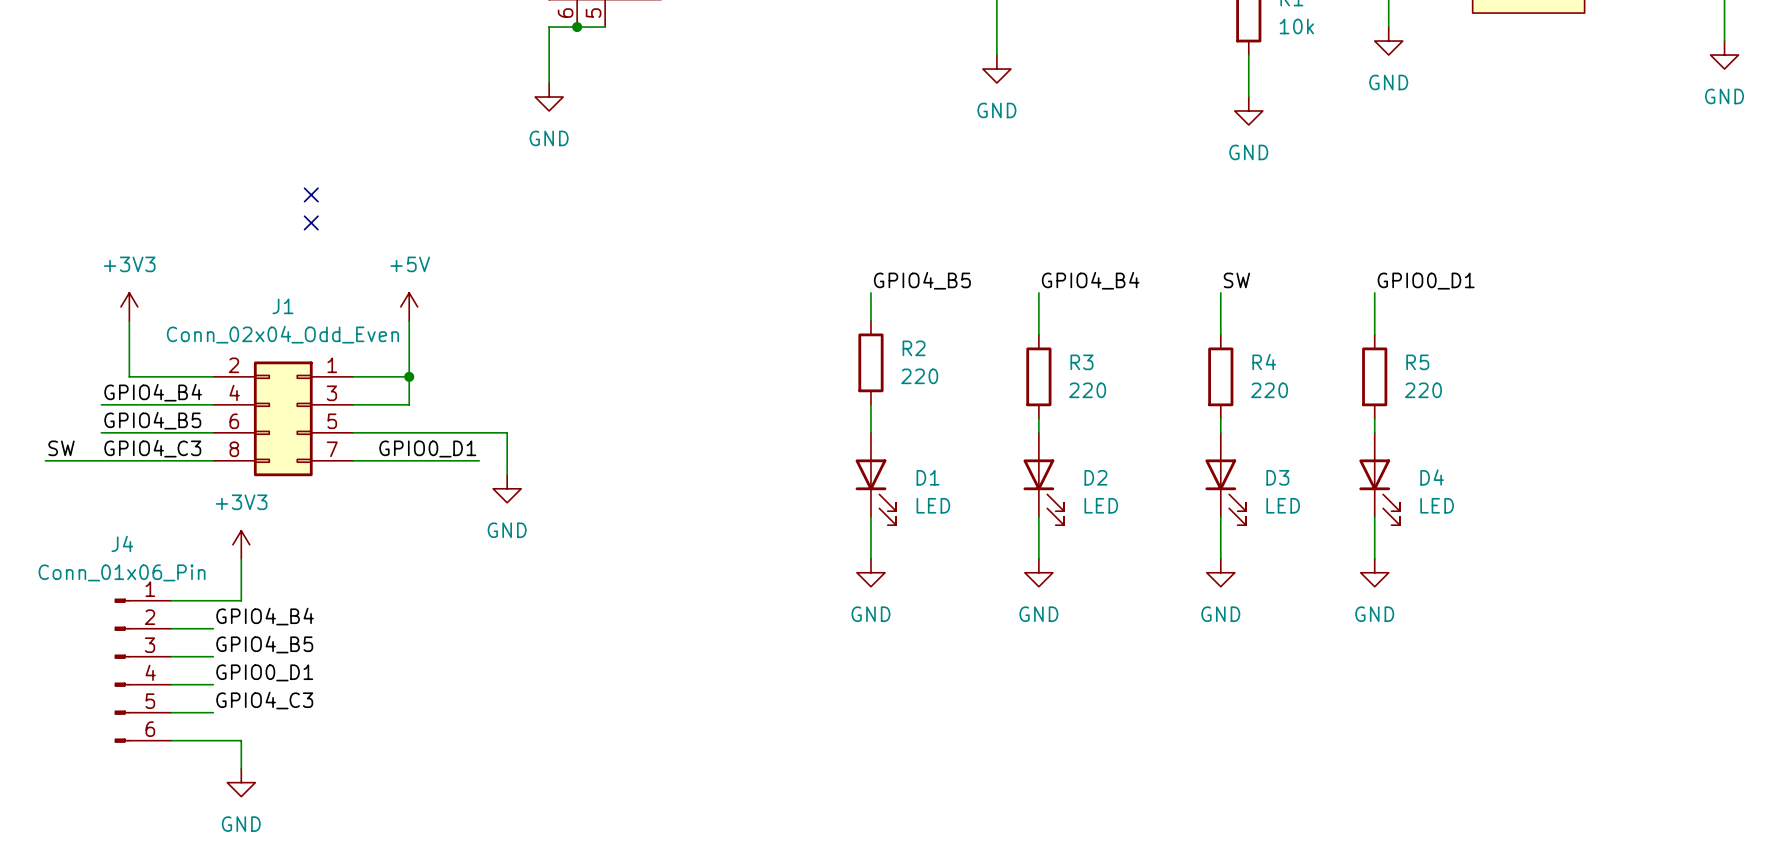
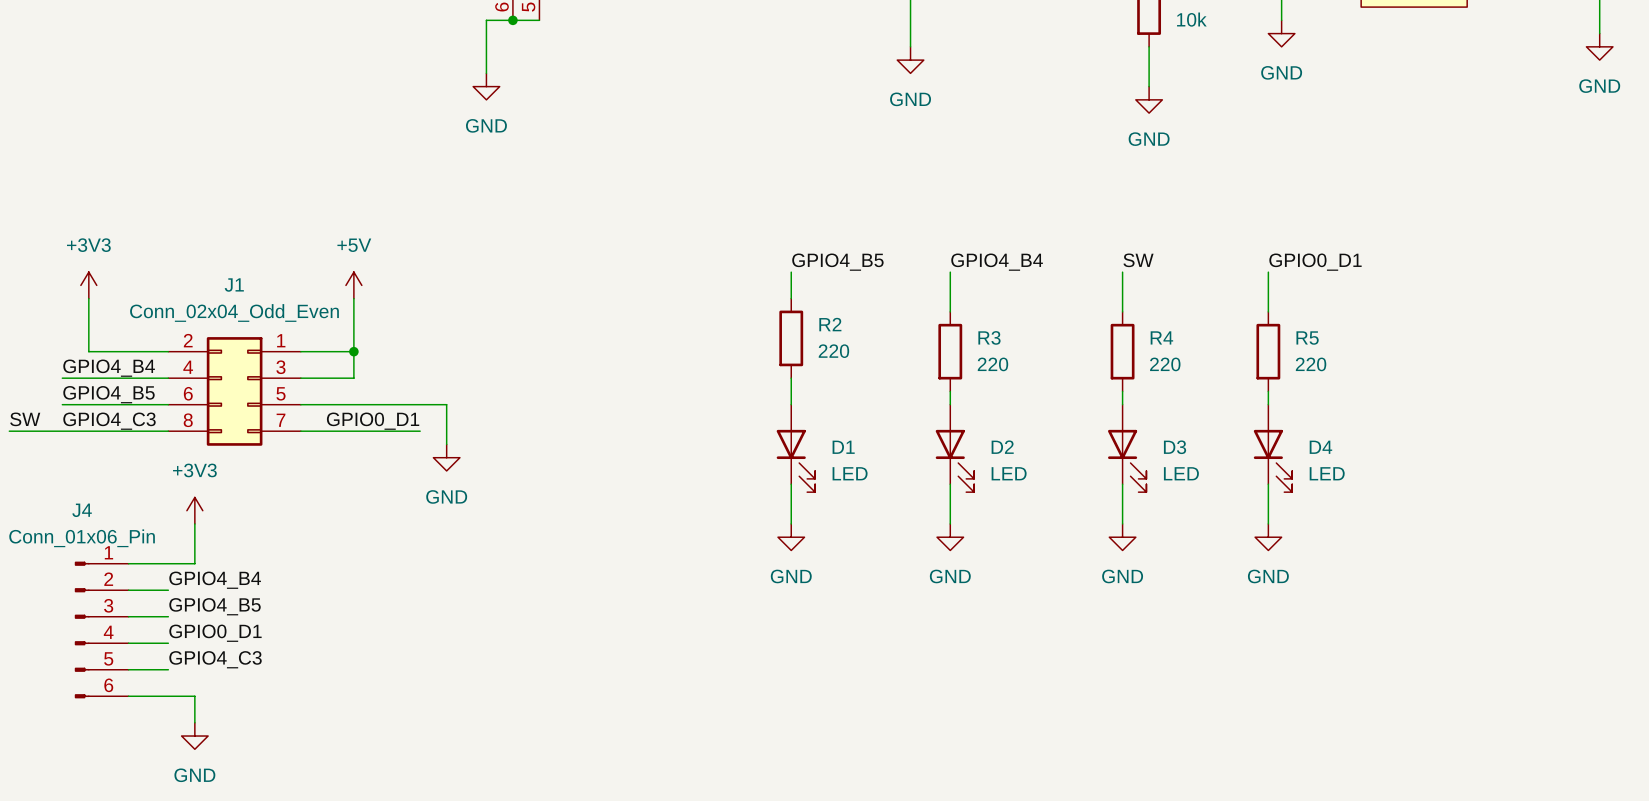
no-connect mark: (311, 194) -> none
no-connect mark: (311, 222) -> none

